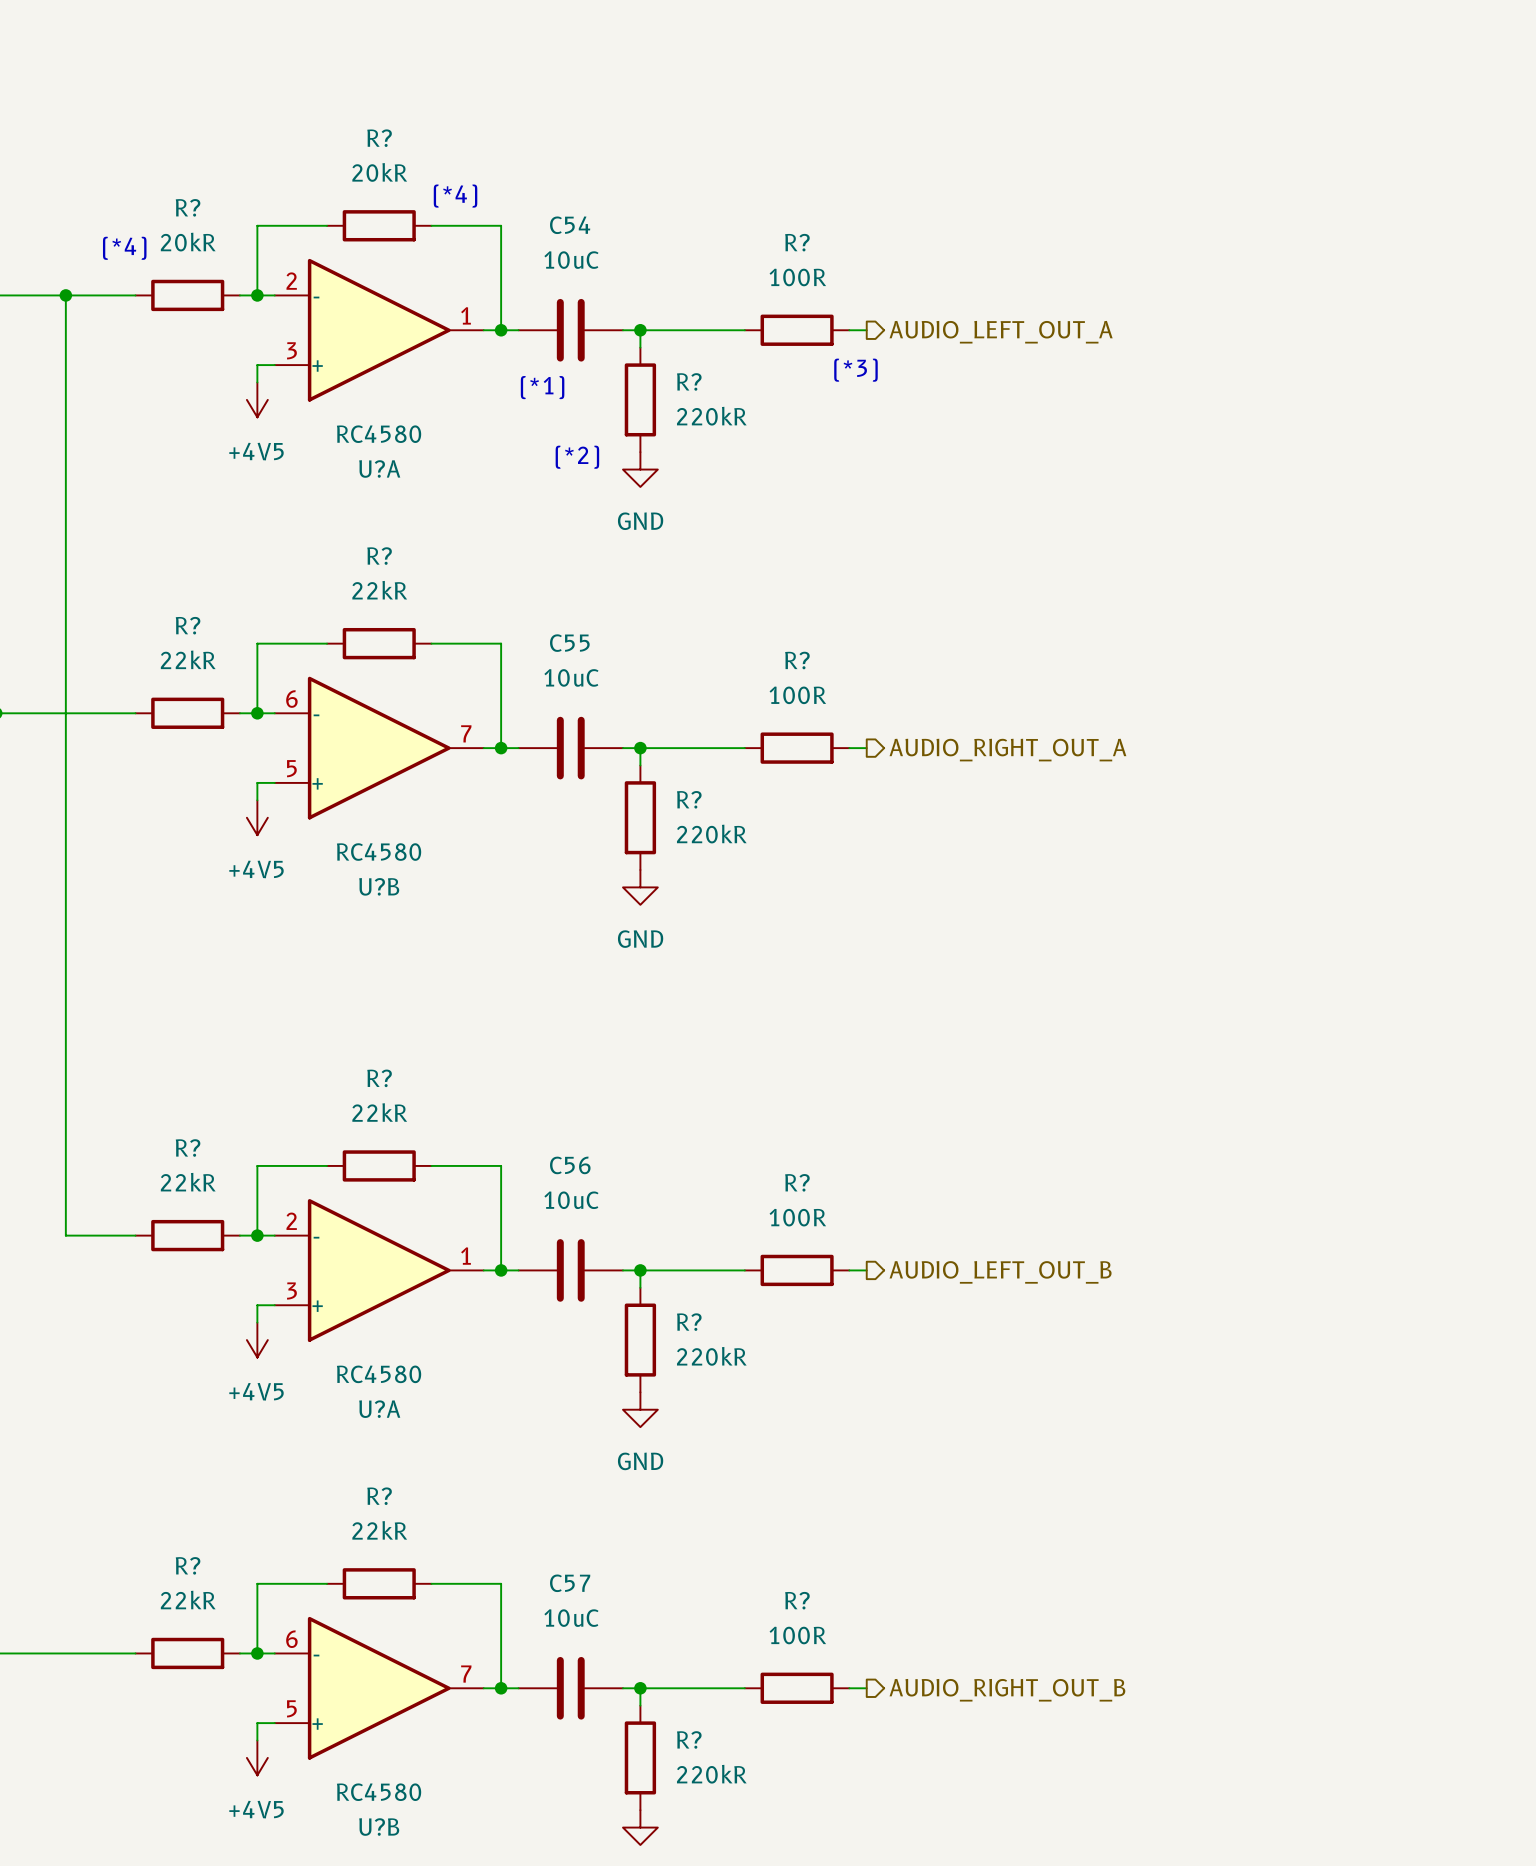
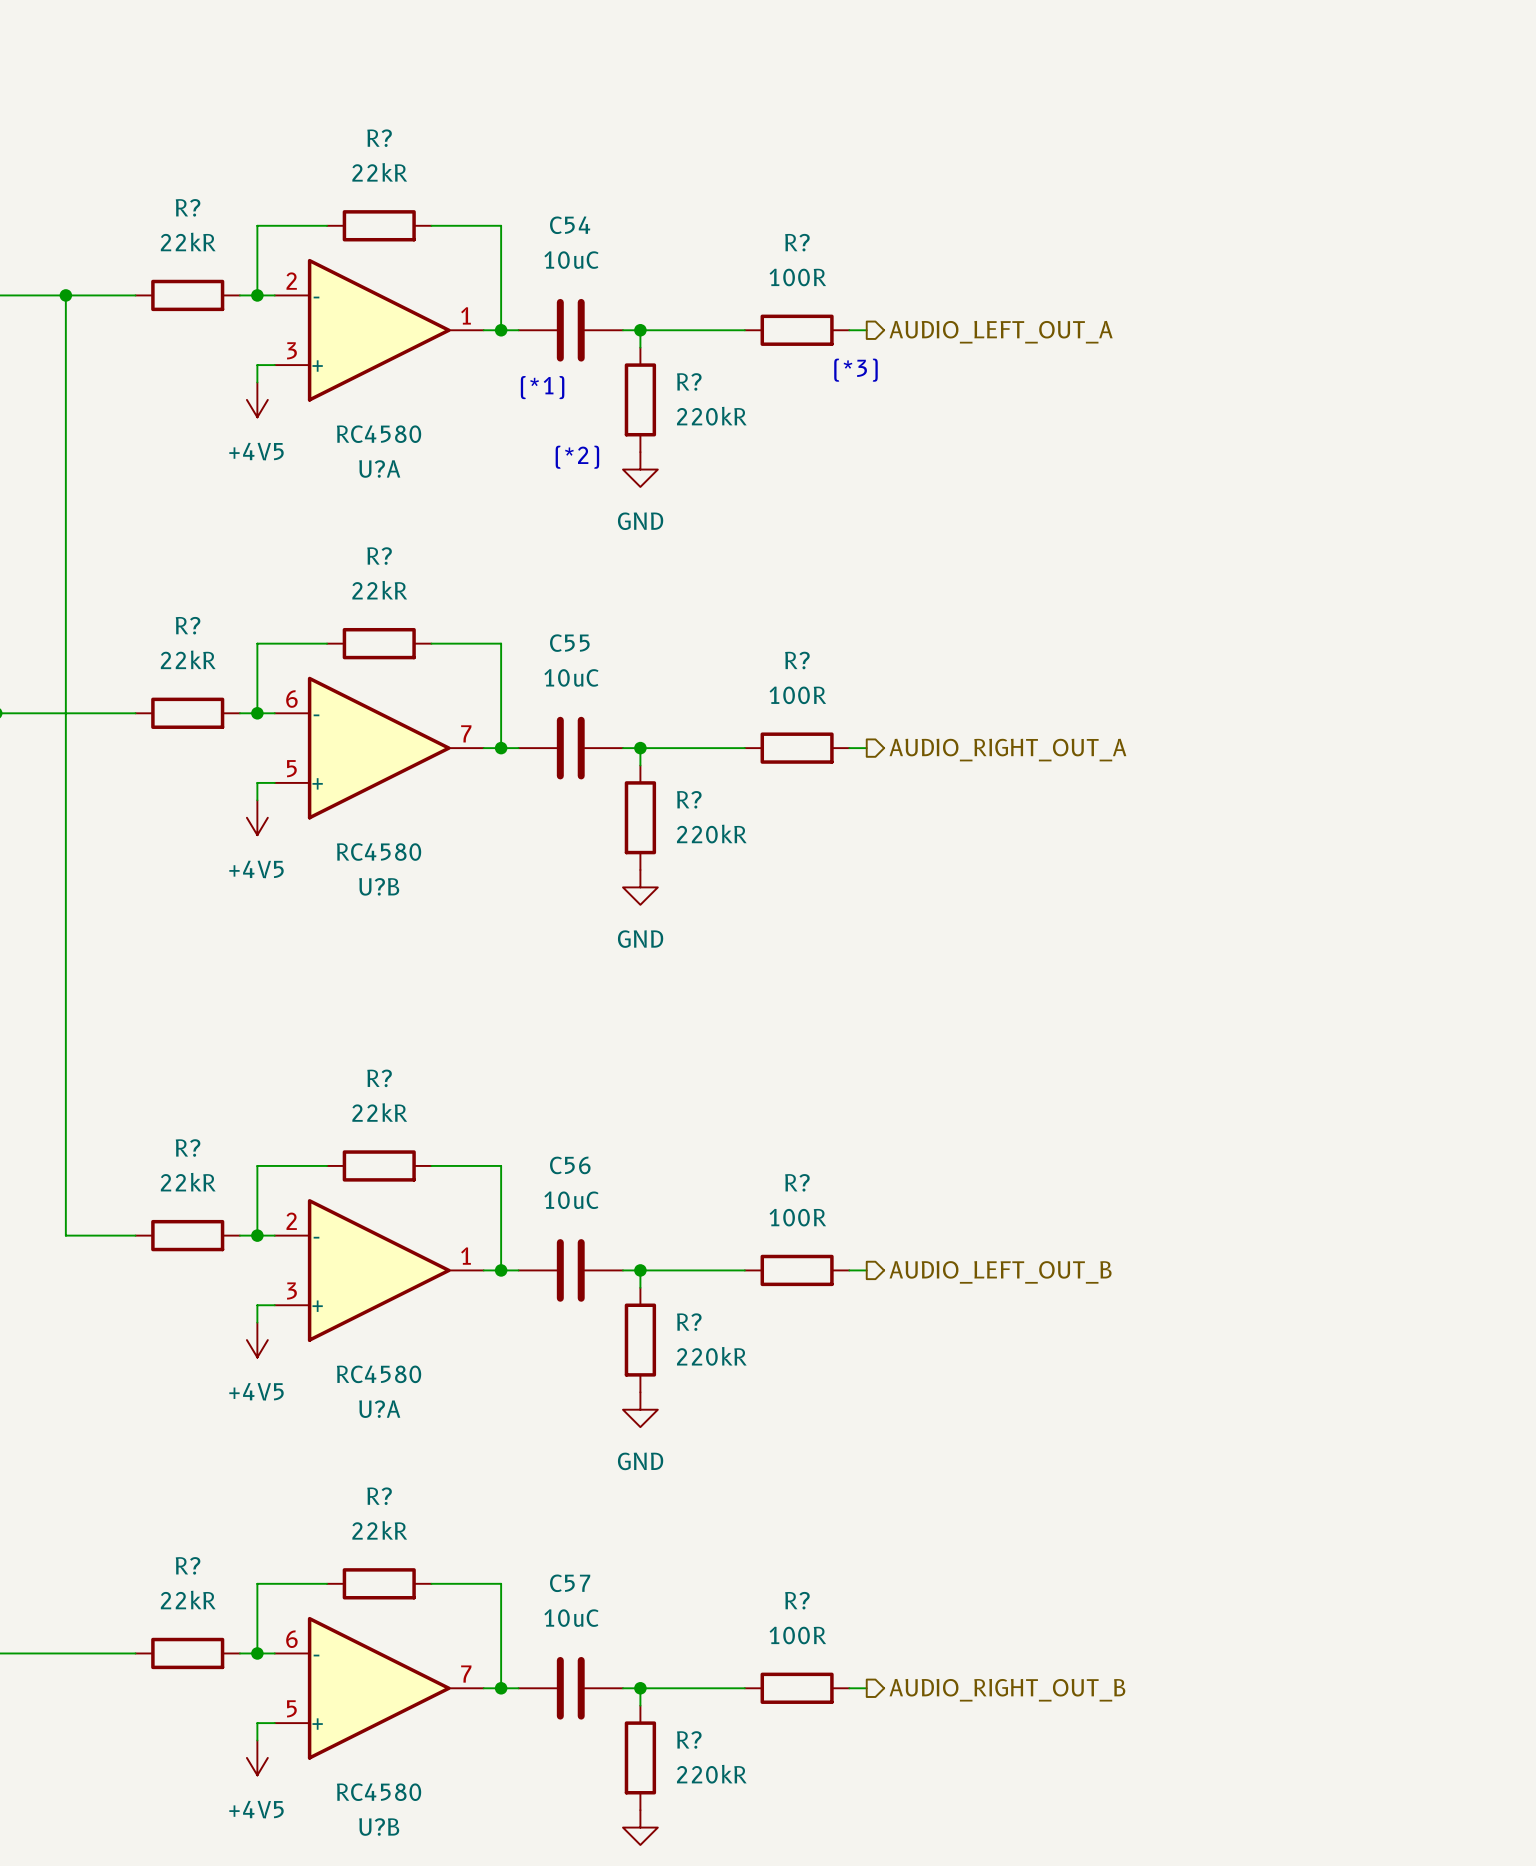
R? value: 20kR (379, 172) -> 22kR (379, 172)
text: (*4) (455, 196) -> none
R? value: 20kR (188, 242) -> 22kR (188, 241)
text: (*4) (124, 248) -> none

